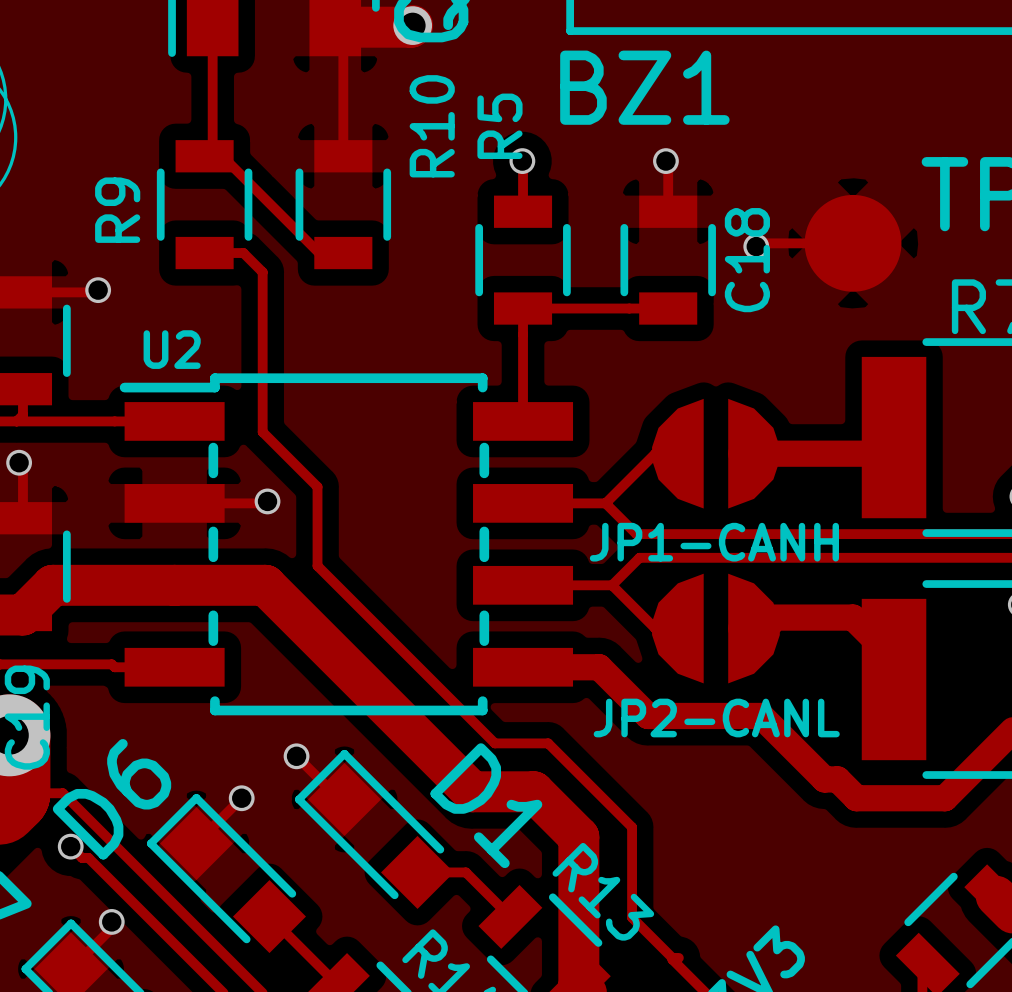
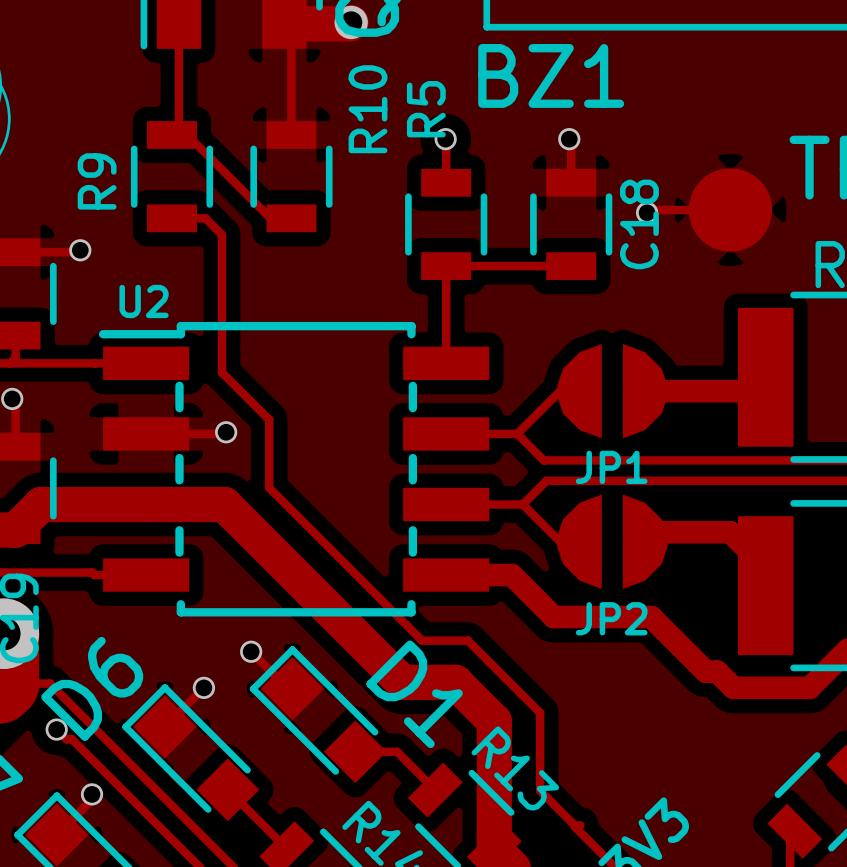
JP1-CANH name: JP1-CANH (714, 542) -> JP1 (611, 467)
JP2-CANL name: JP2-CANL (716, 717) -> JP2 (611, 618)

